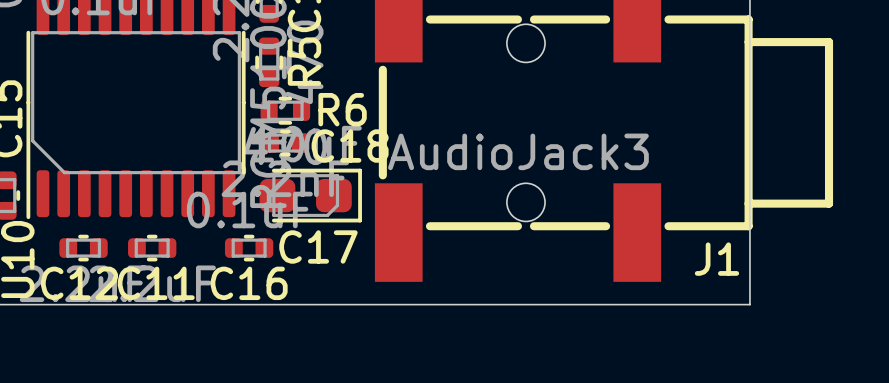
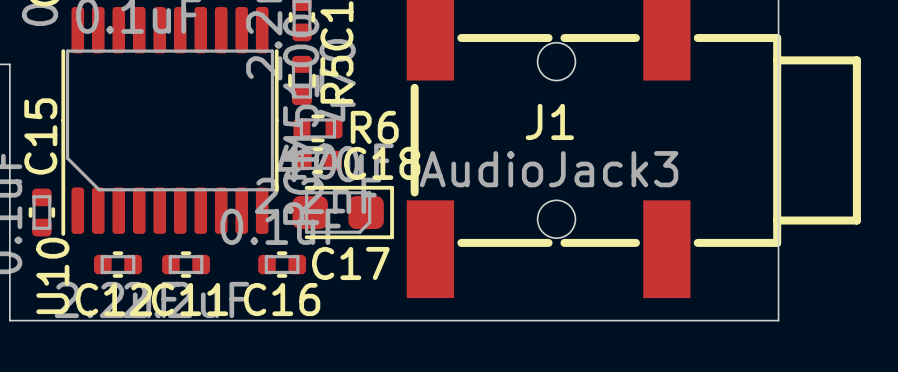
J1 name position: J1 (716, 259) -> J1 (549, 121)

